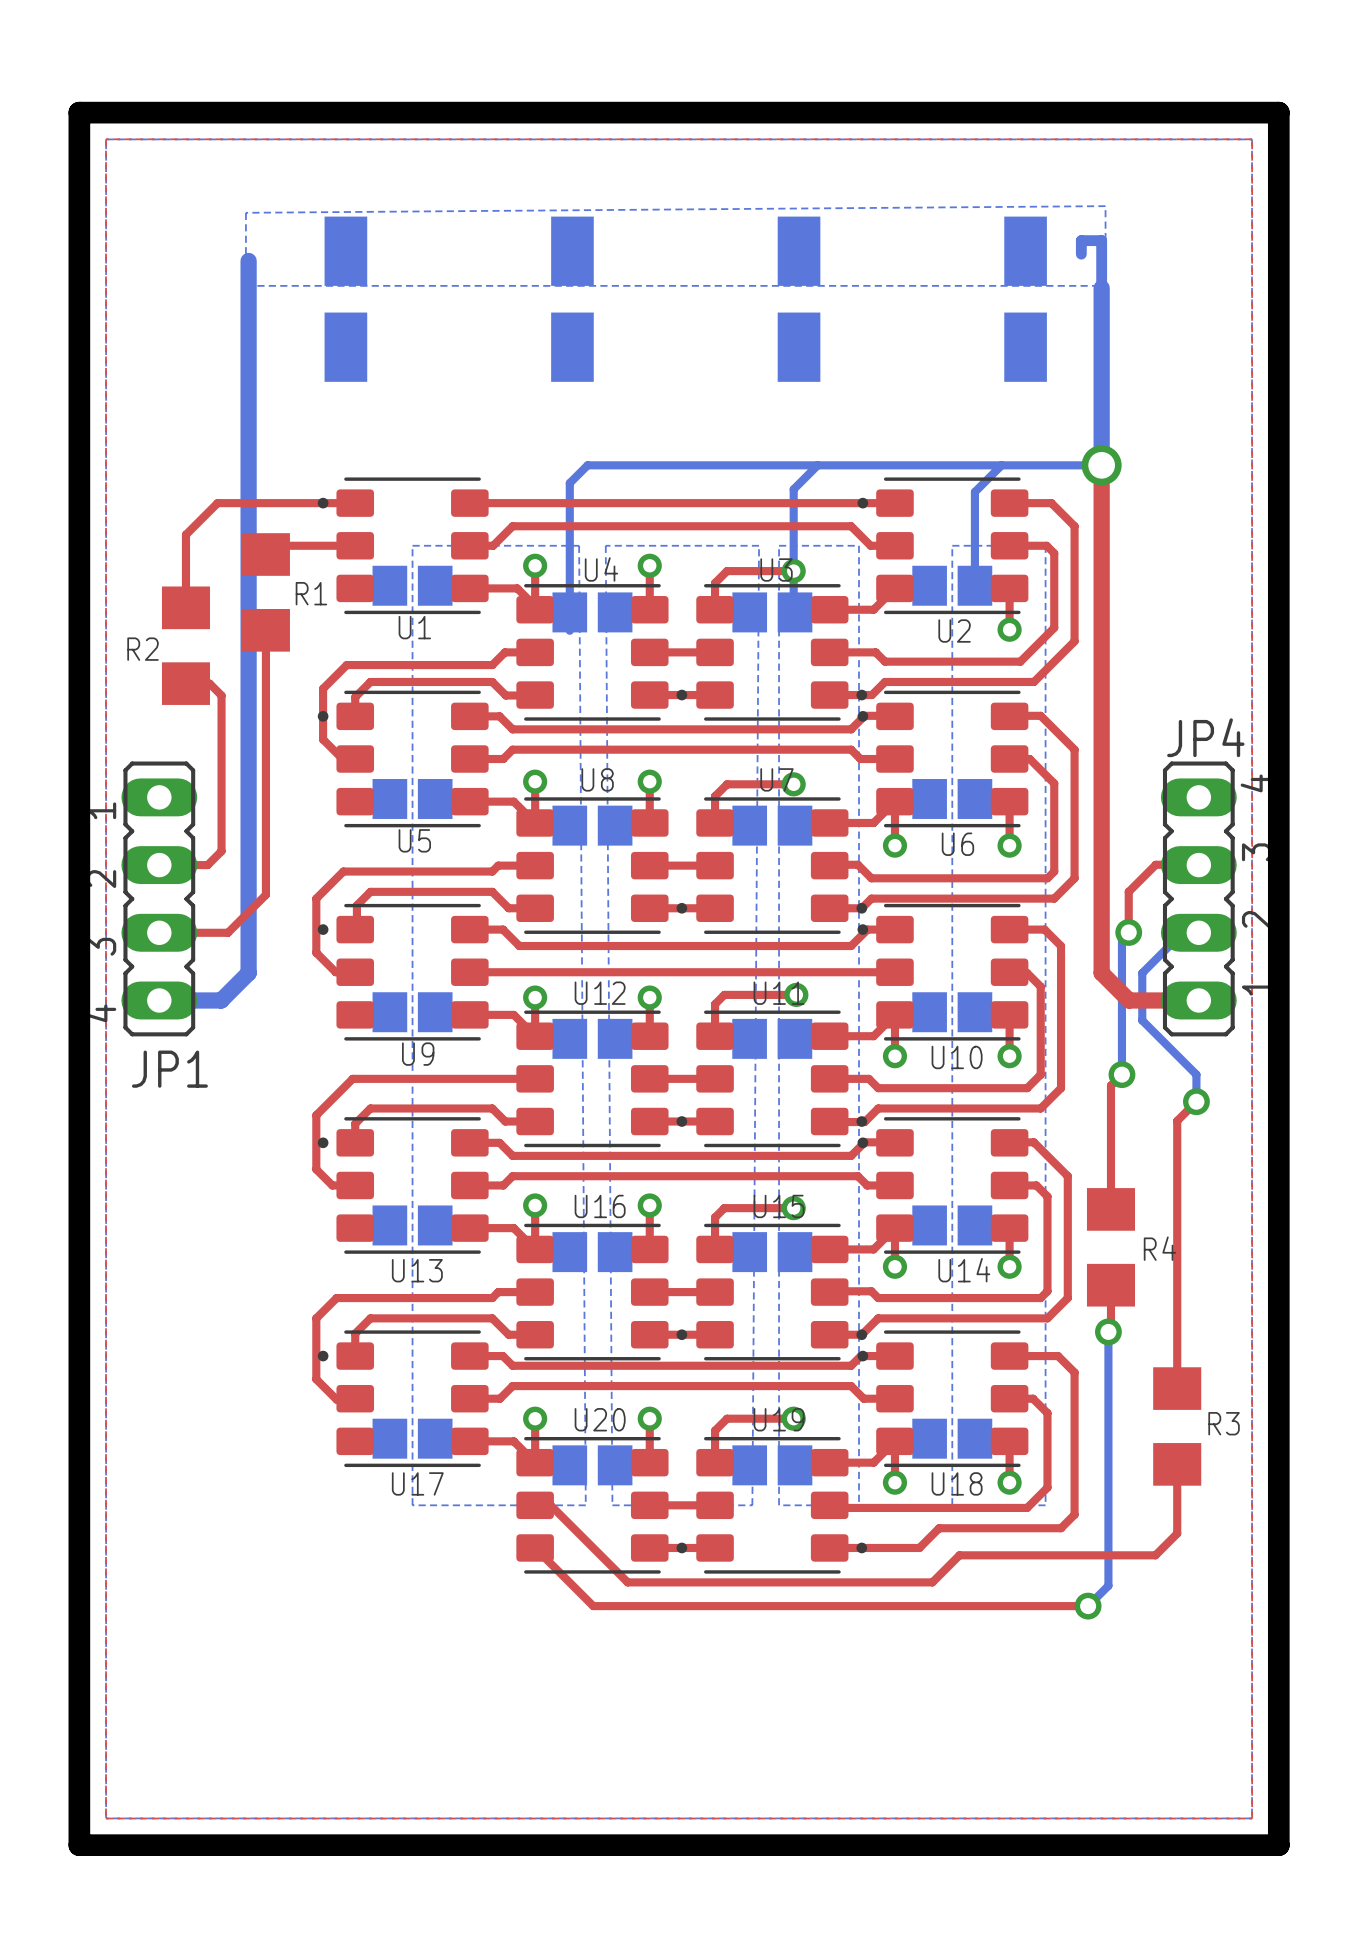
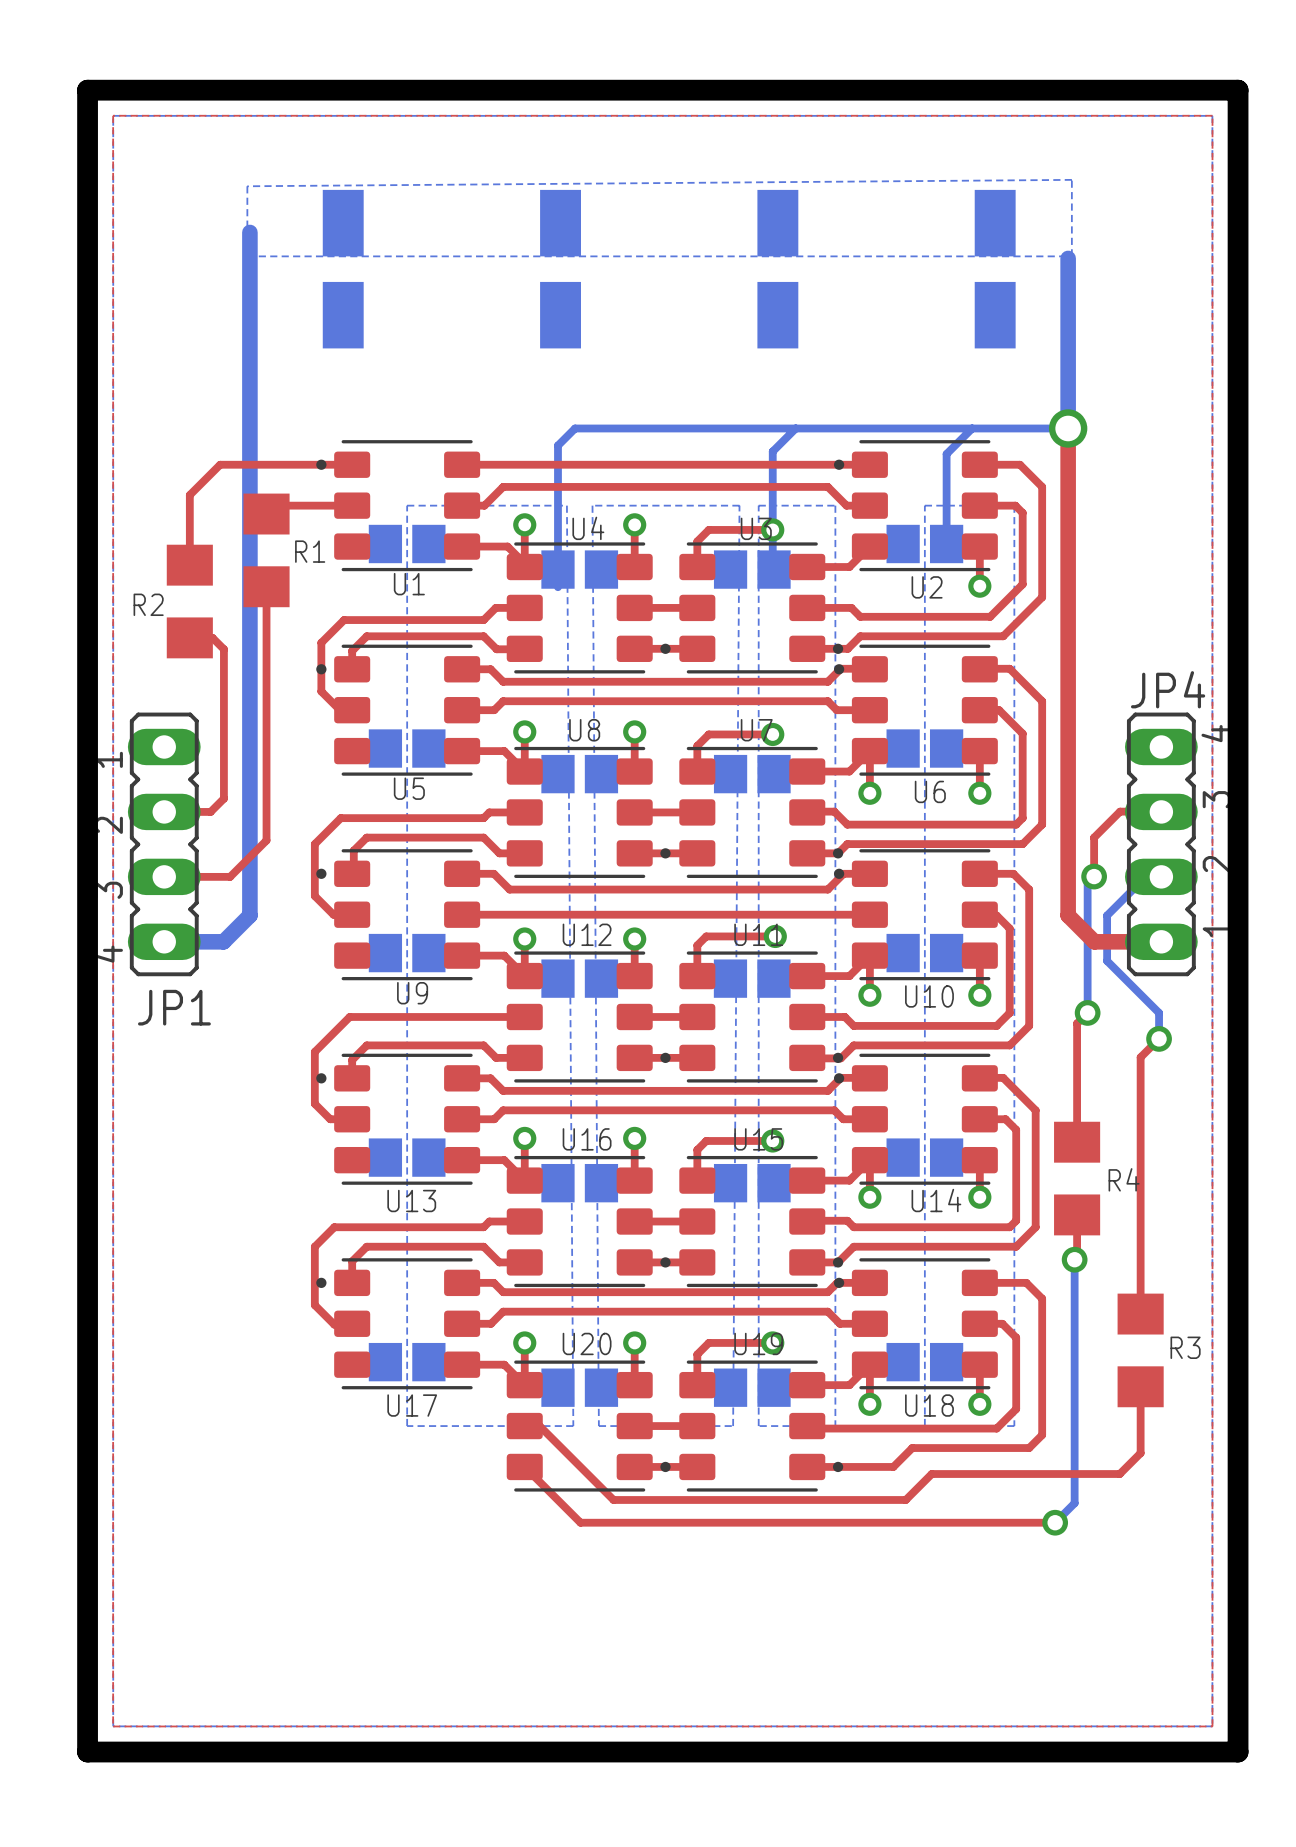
bottom track: (1081, 254) (1081, 240) (1101, 240) (1101, 288) -> none

